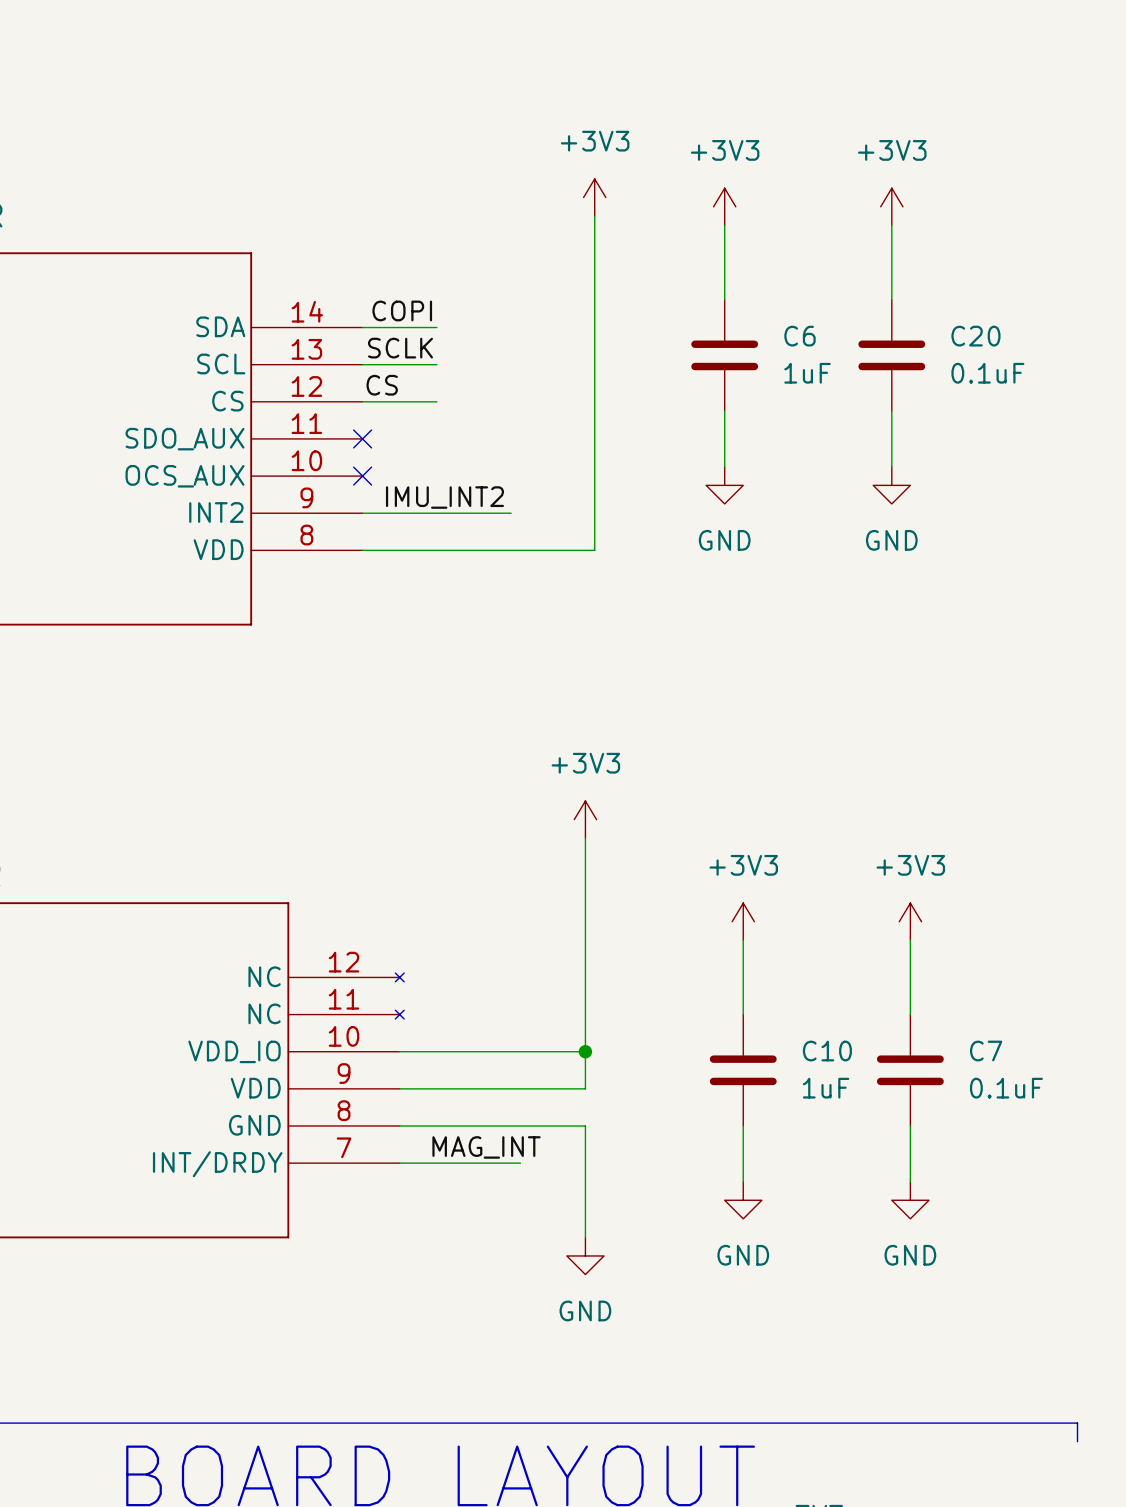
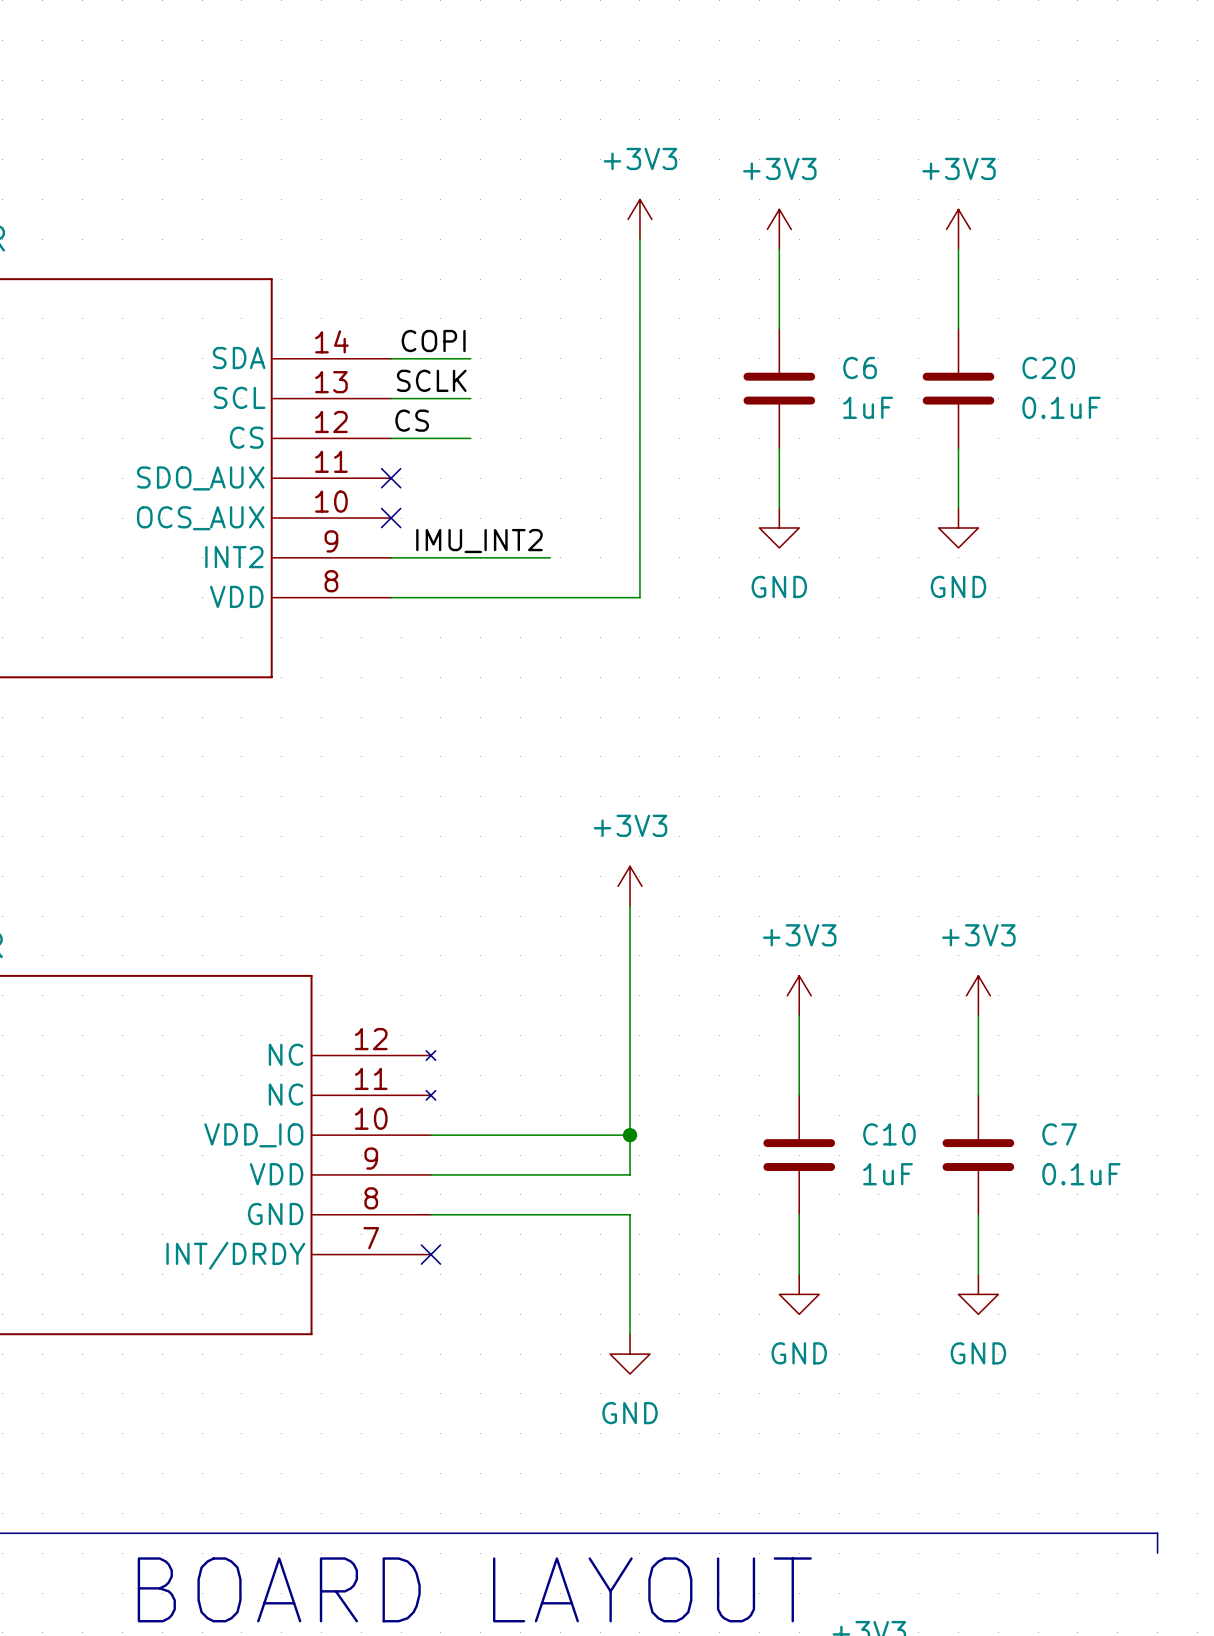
label: MAG_INT (486, 1147) -> none
wire: (399, 1163) (520, 1163) -> none
no-connect mark: none -> (430, 1254)

